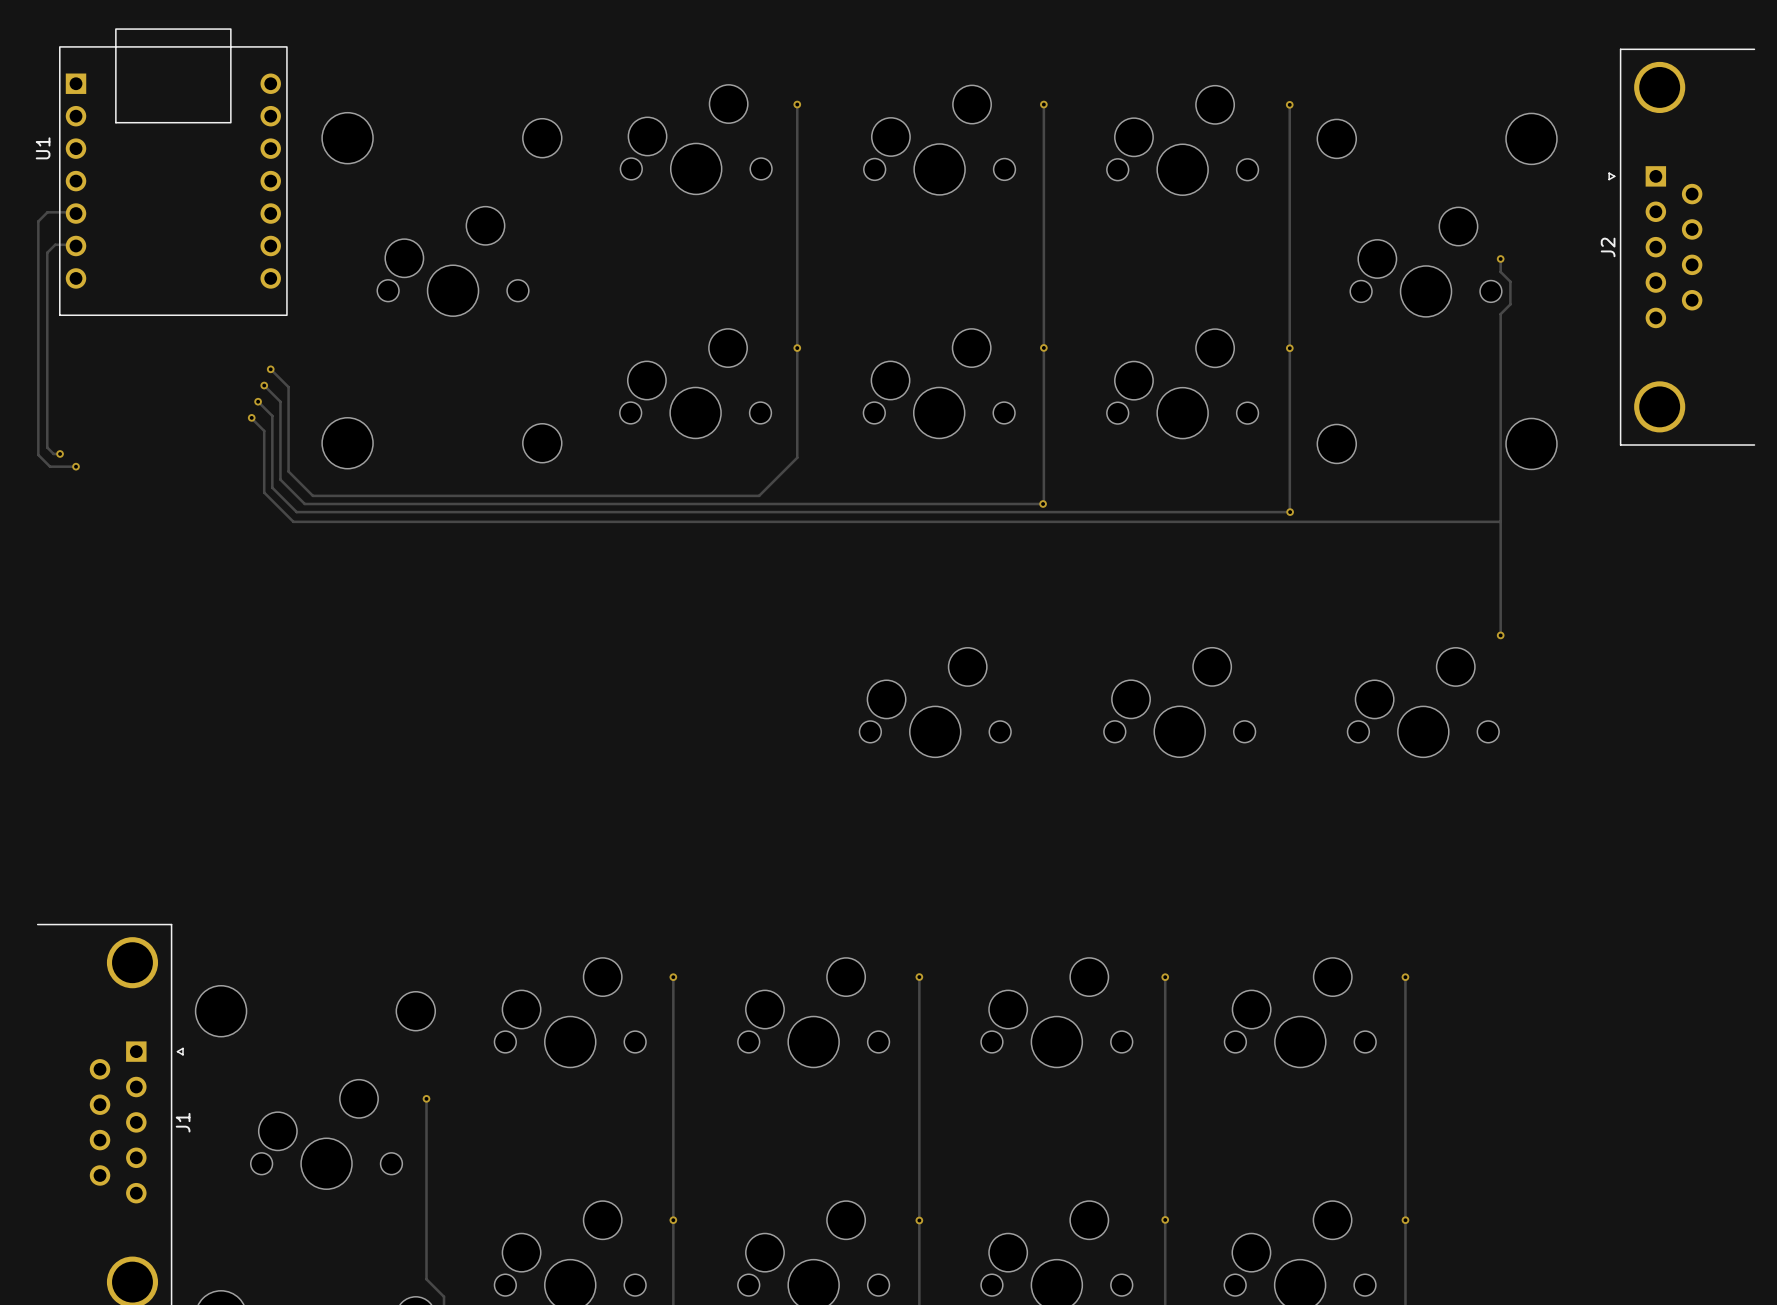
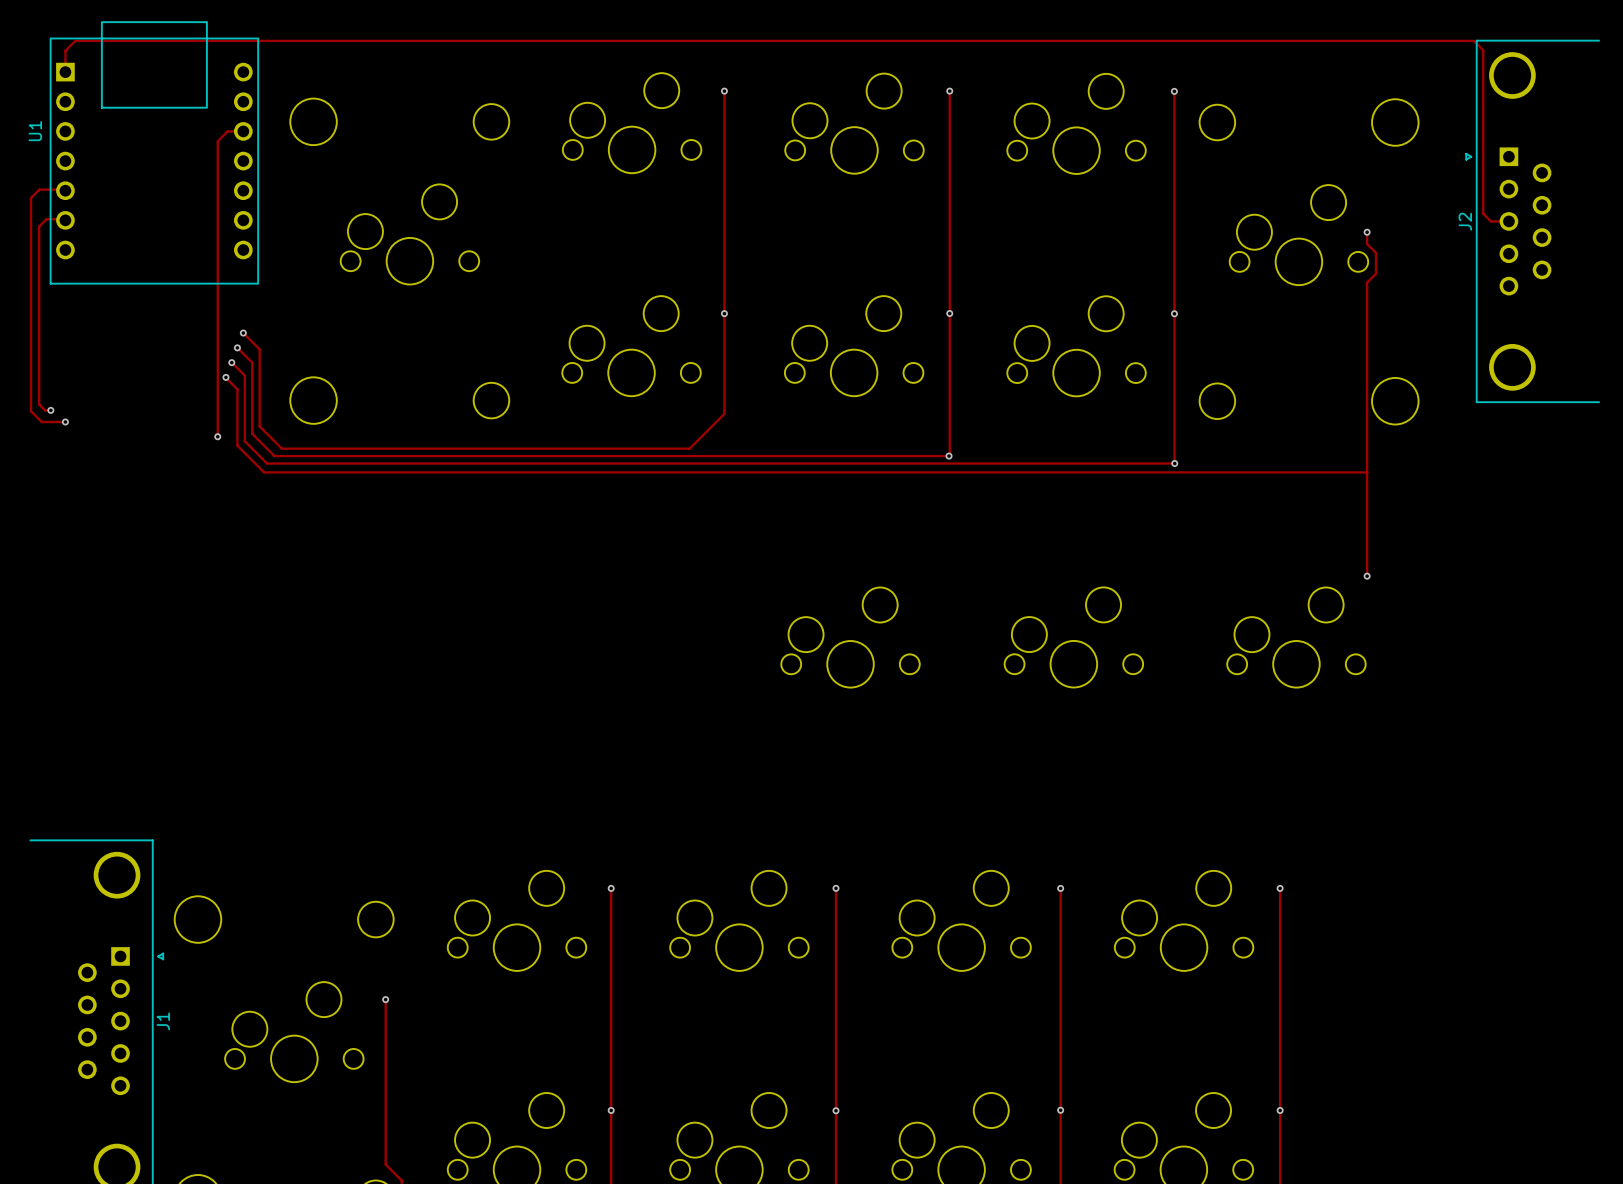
track: none -> (65, 72) (65, 50) (75, 40) (1473, 40) (1483, 50) (1483, 213) (1490, 221) (1508, 221)
track: none -> (243, 131) (227, 131) (217, 141) (217, 436)
via: none -> (217, 436)

